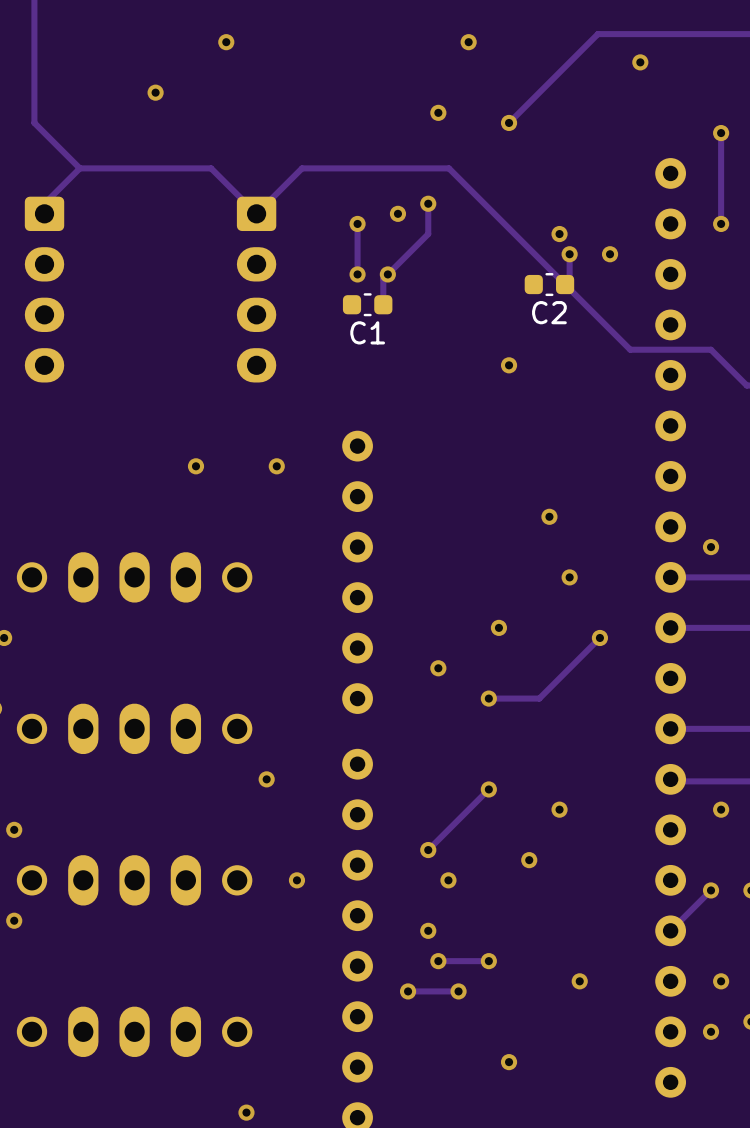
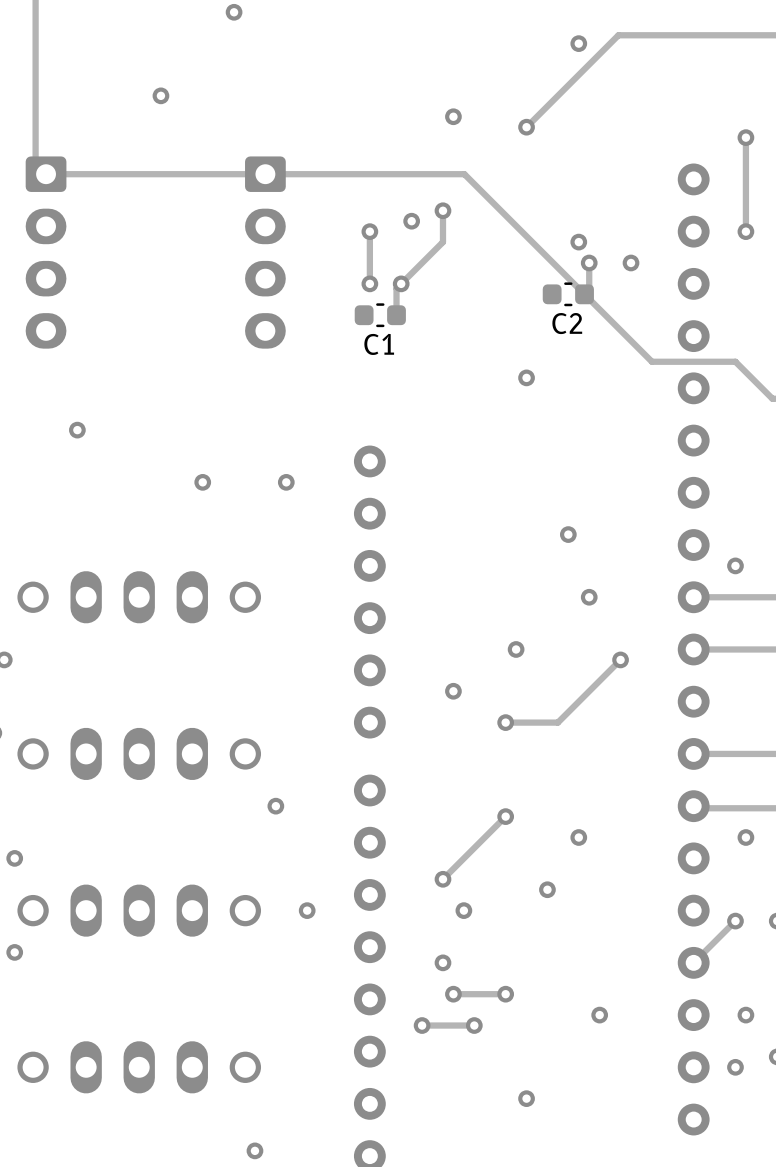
via position: (226, 42) -> (234, 12)
via: (468, 42) -> none
via: none -> (578, 43)
via: (640, 62) -> none
track: (34, 122) (79, 168) (44, 203) (44, 213) -> (35, 127) (35, 163) (46, 174) (82, 174)
track: (302, 168) (256, 213) (211, 168) -> (312, 174) (218, 174)
part position: (44, 289) -> (46, 252)
part position: (256, 289) -> (265, 252)
via: none -> (77, 430)

